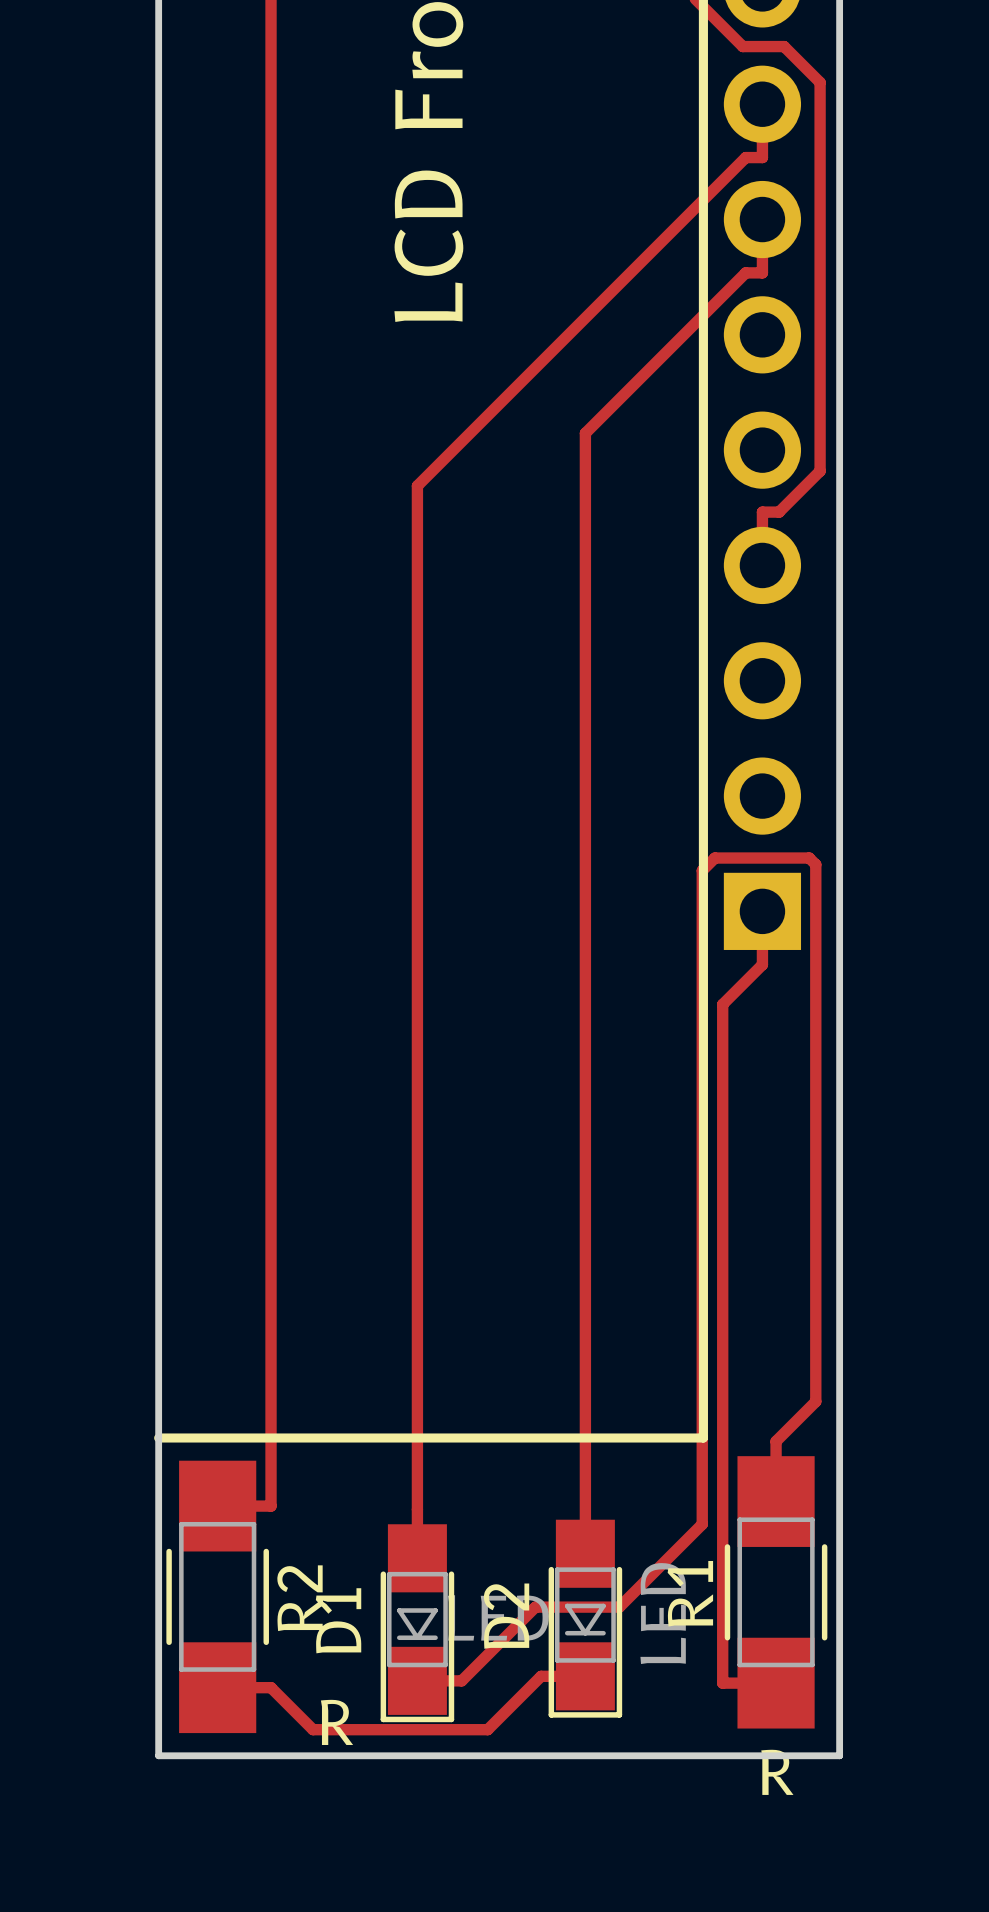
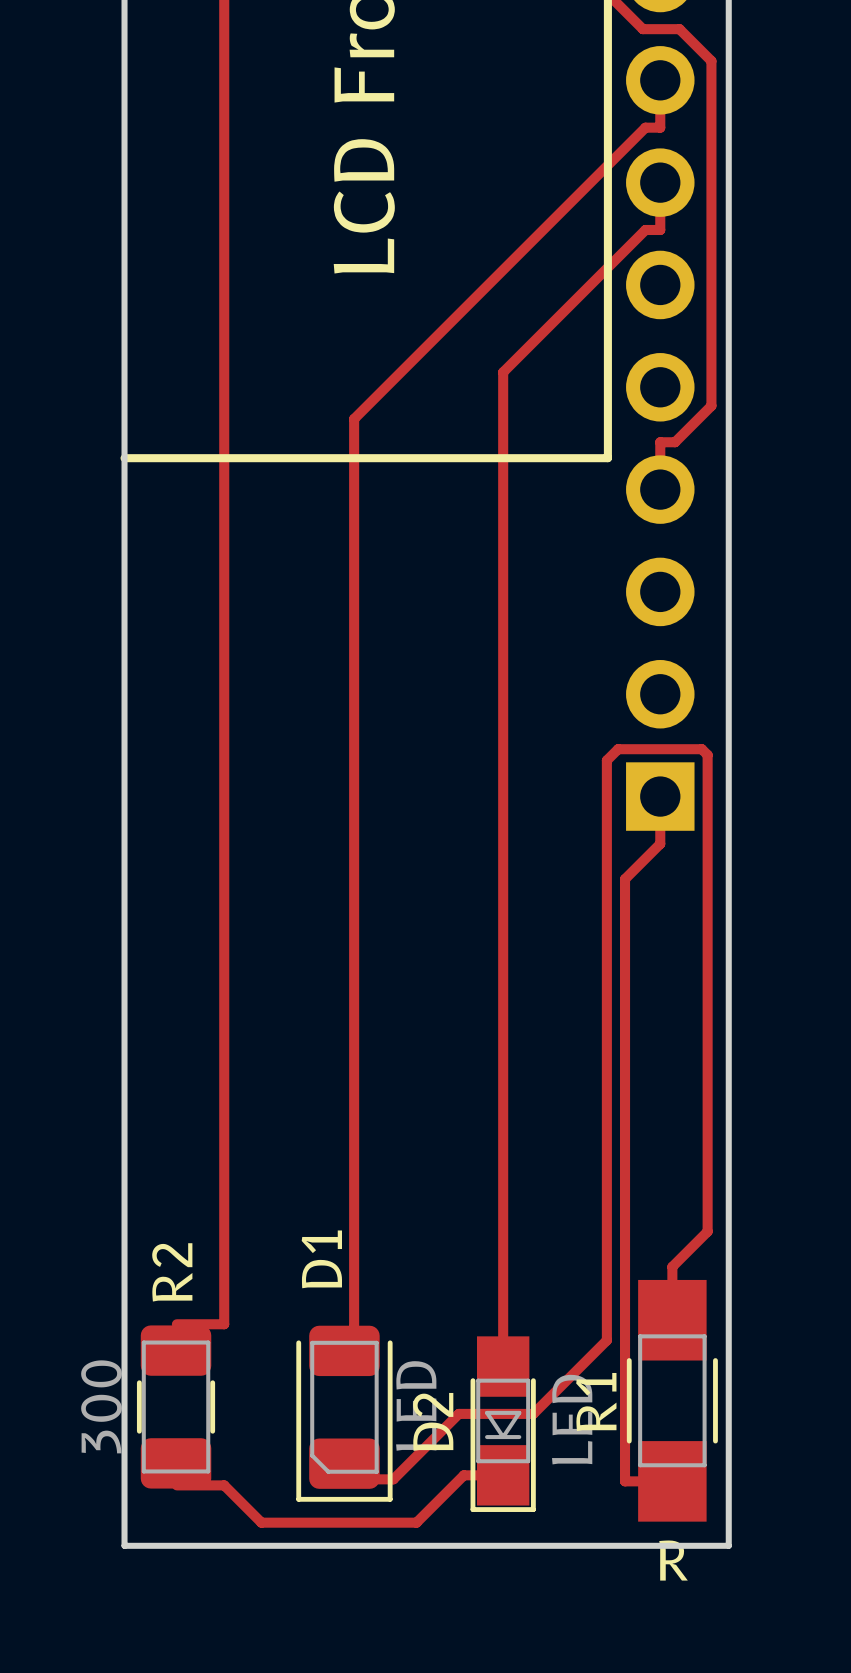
line: (703, 530) (703, 1437) (158, 1437) -> (607, 458) (124, 458)
R2 footprint: [166, 1460, 269, 1734] -> [136, 1325, 216, 1489]
D1 footprint: [380, 1524, 455, 1723] -> [296, 1325, 393, 1502]
R2 name position: R2 (300, 1598) -> R2 (172, 1272)
D1 name position: D1 (338, 1620) -> D1 (321, 1259)
R2 value: R (337, 1722) -> 300 (101, 1406)

